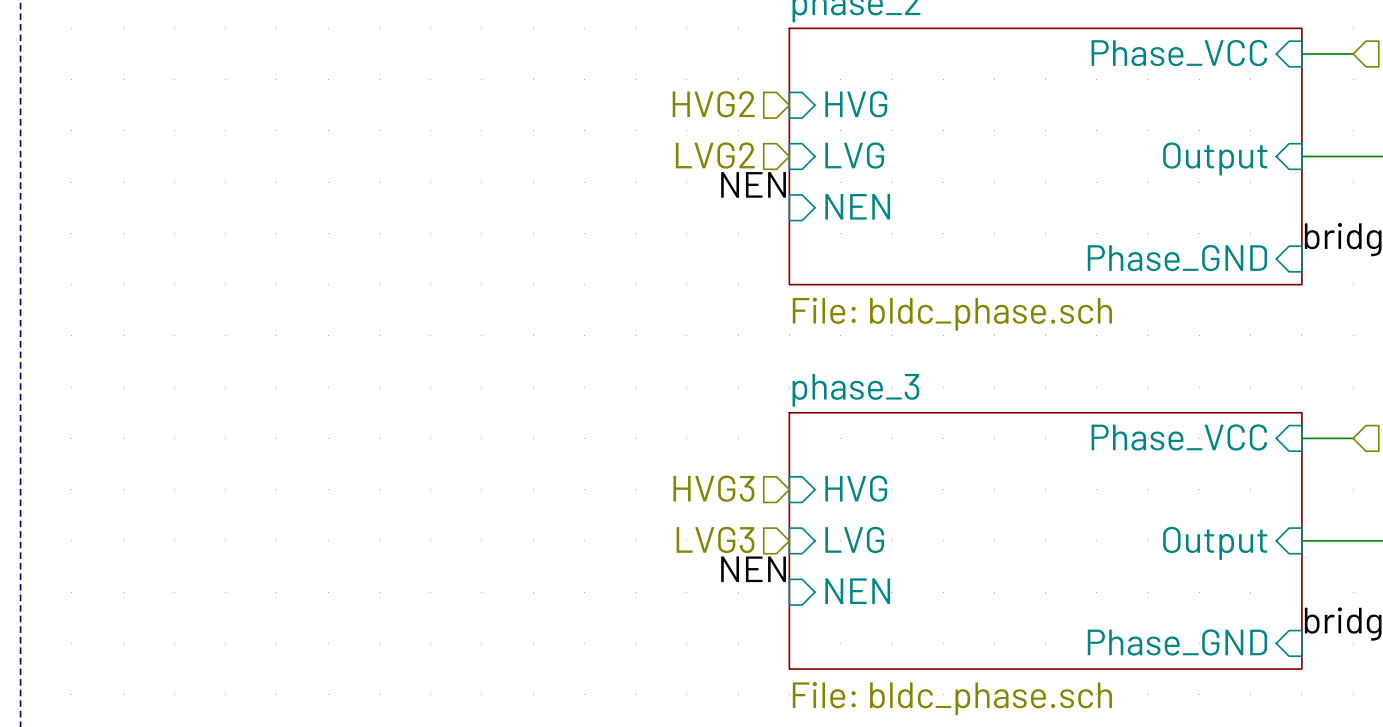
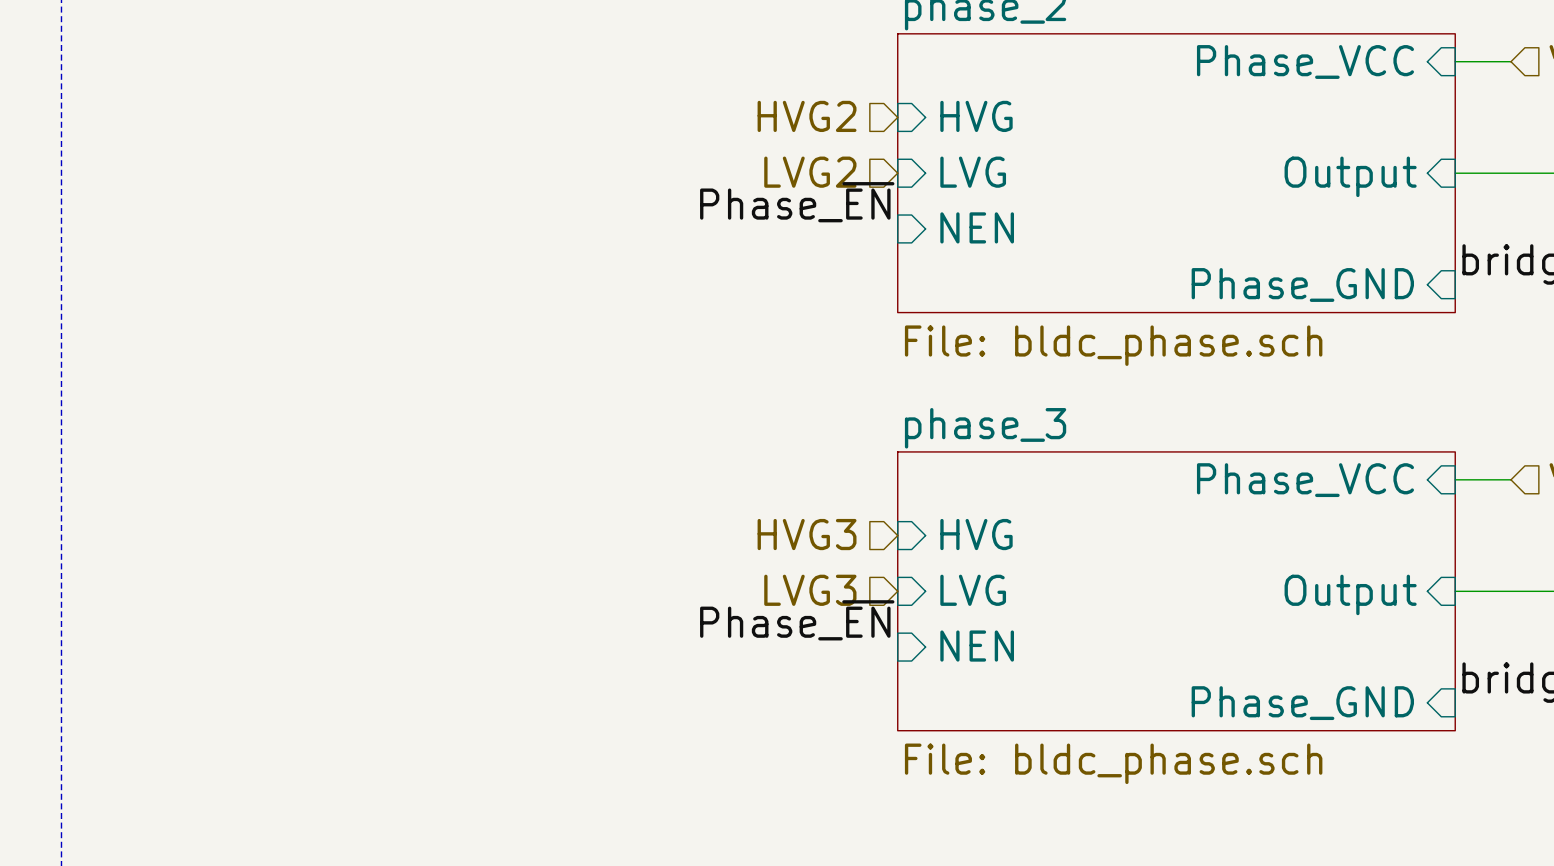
label: NEN (753, 184) -> Phase_~{EN} (797, 202)
label: NEN (753, 569) -> Phase_~{EN} (797, 620)

